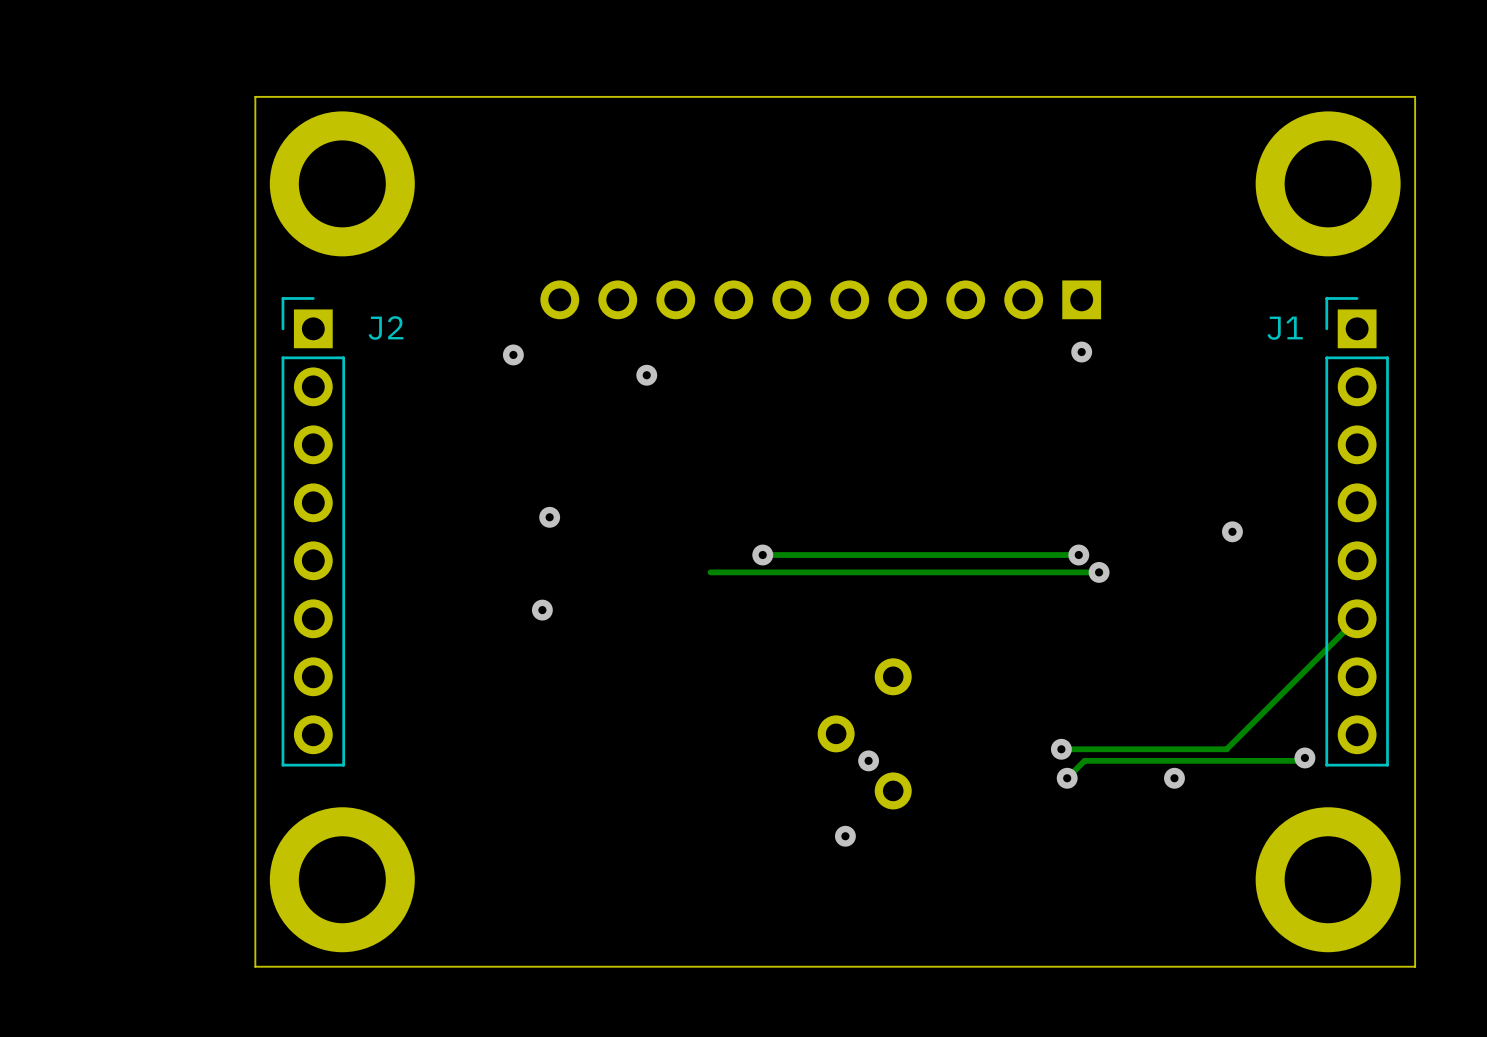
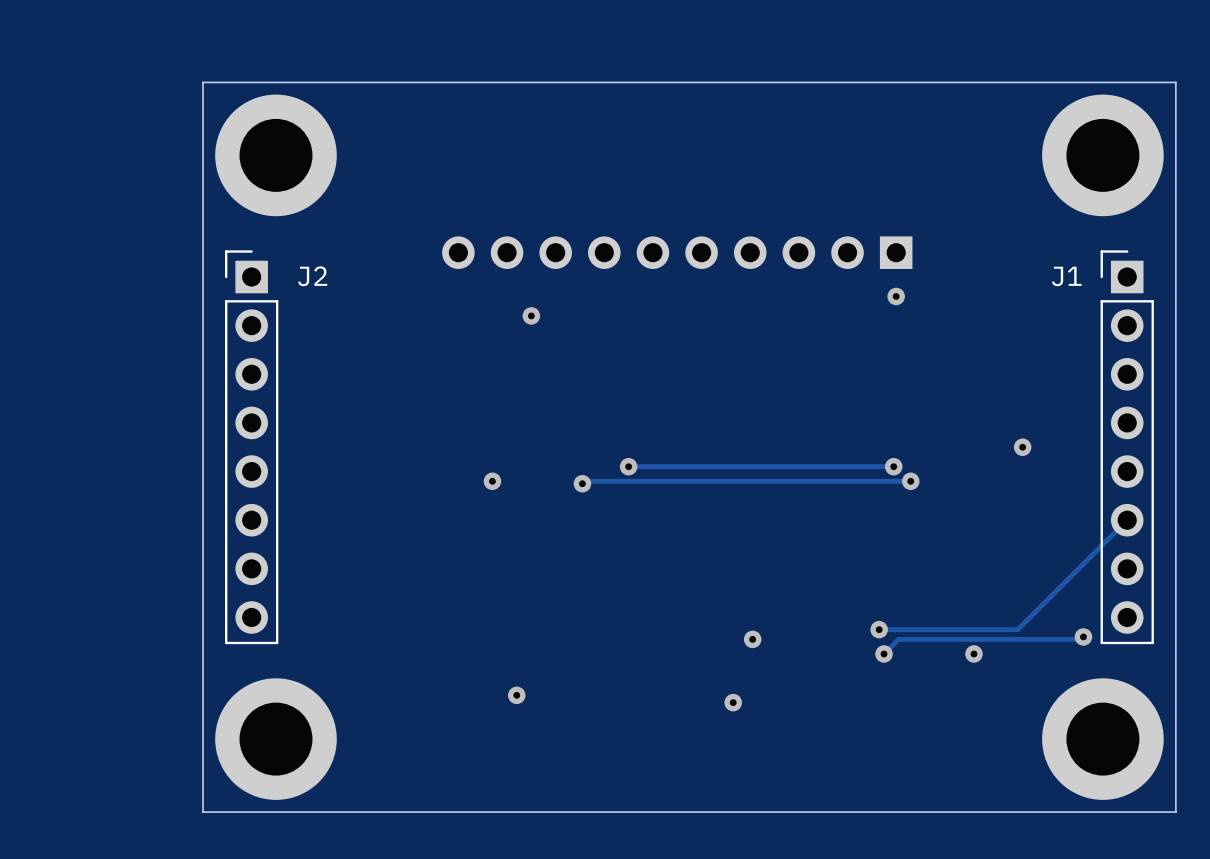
via: (513, 354) -> none
via: (549, 517) -> none
via: none -> (492, 481)
via: none -> (582, 483)
via: (542, 610) -> none
part: (864, 733) -> none
via: (868, 760) -> none
via: none -> (752, 639)
via: none -> (516, 695)
via: (845, 836) -> none
via: none -> (733, 702)

